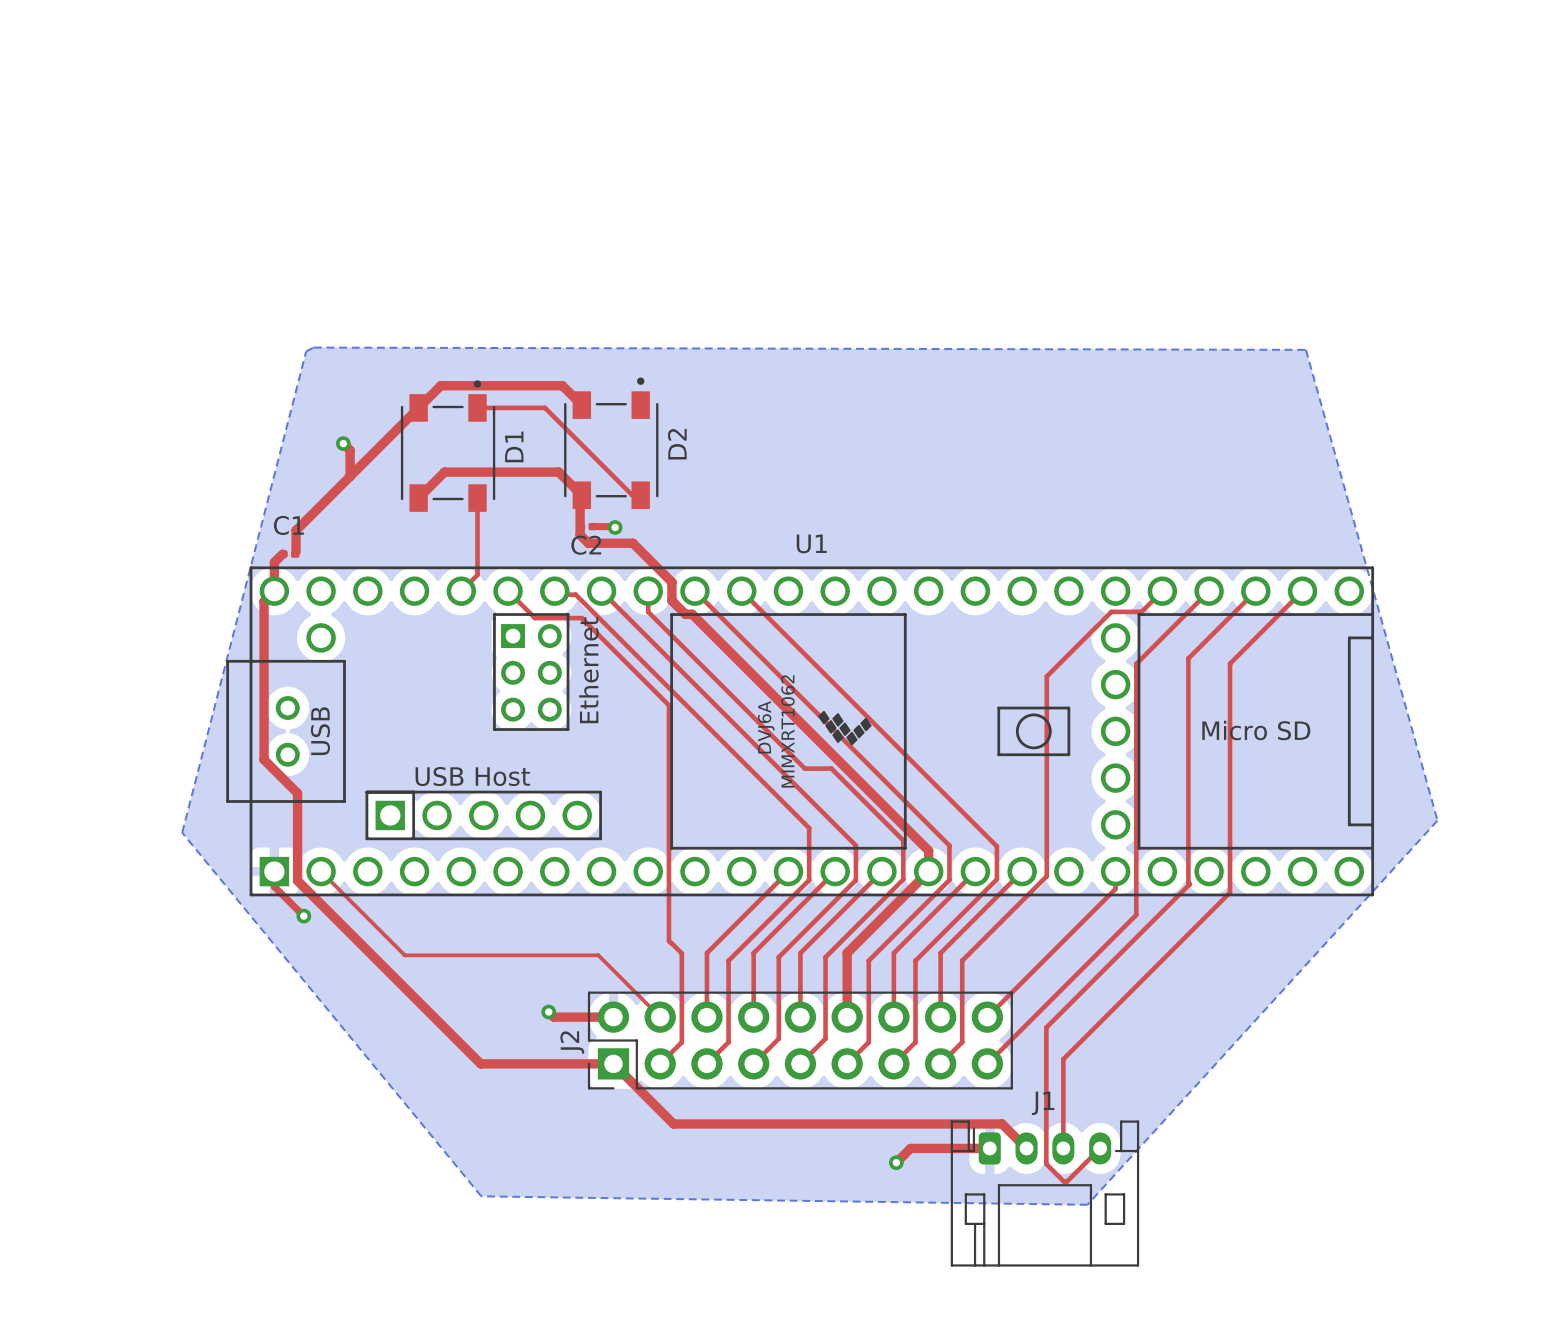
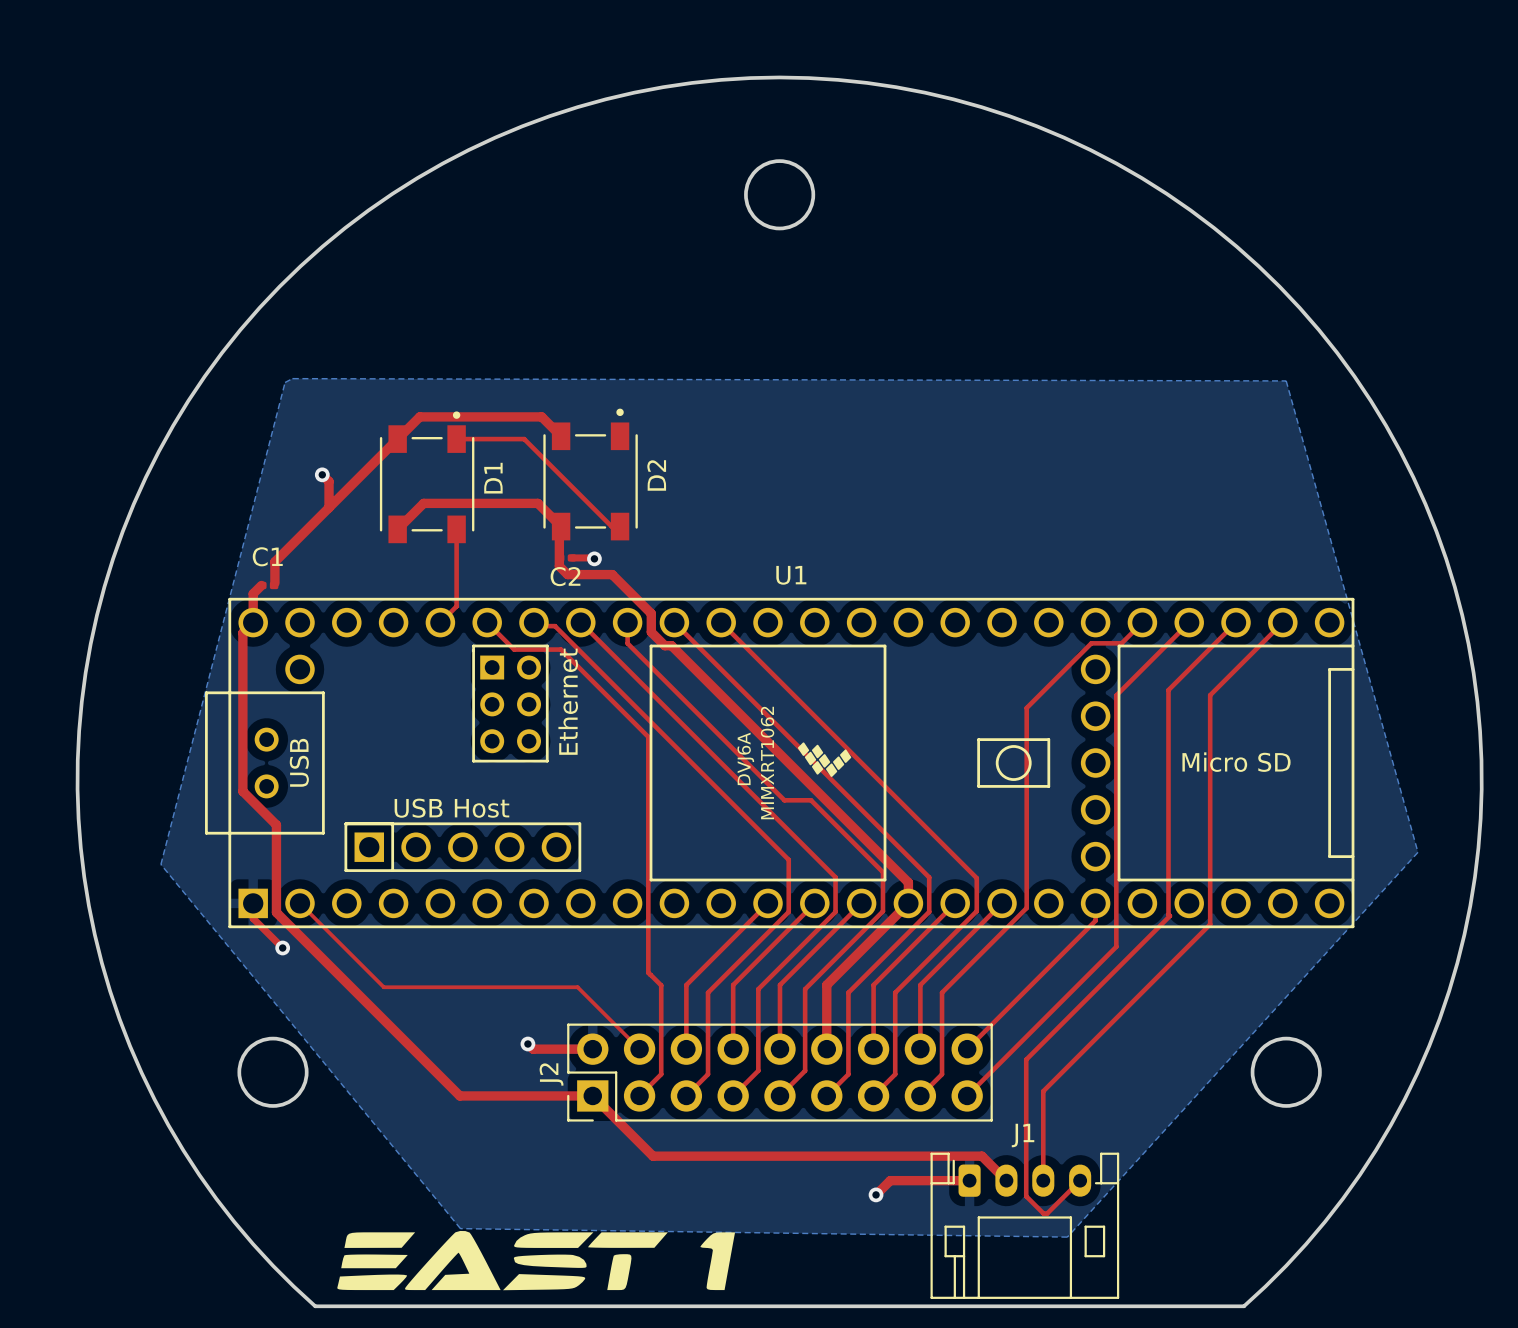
round board edge: none -> [744, 159, 816, 231]
round board edge: none -> [237, 1036, 309, 1108]
round board edge: none -> [1250, 1036, 1322, 1108]
drawing: none -> [337, 1230, 736, 1291]
board edge: none -> (315, 1306) (1243, 1306) (1306, 1244) (1359, 1174) (1390, 1125) (1417, 1073) (1449, 991) (1464, 934) (1474, 877) (1481, 789) (1480, 730) (1468, 643) (1454, 587) (1425, 504) (1400, 451) (1370, 400) (1337, 352) (1299, 307) (1236, 246) (1190, 210) (1141, 178) (1090, 150) (1009, 116) (924, 92) (867, 82) (808, 78) (750, 78) (692, 82) (605, 99) (549, 116) (468, 150) (417, 178) (345, 228) (300, 266) (259, 307) (204, 376) (173, 425) (145, 477) (122, 531) (104, 587) (85, 672) (79, 730) (78, 818) (88, 905) (101, 963) (130, 1046) (154, 1099) (183, 1150) (234, 1221) (273, 1265) (315, 1306)

